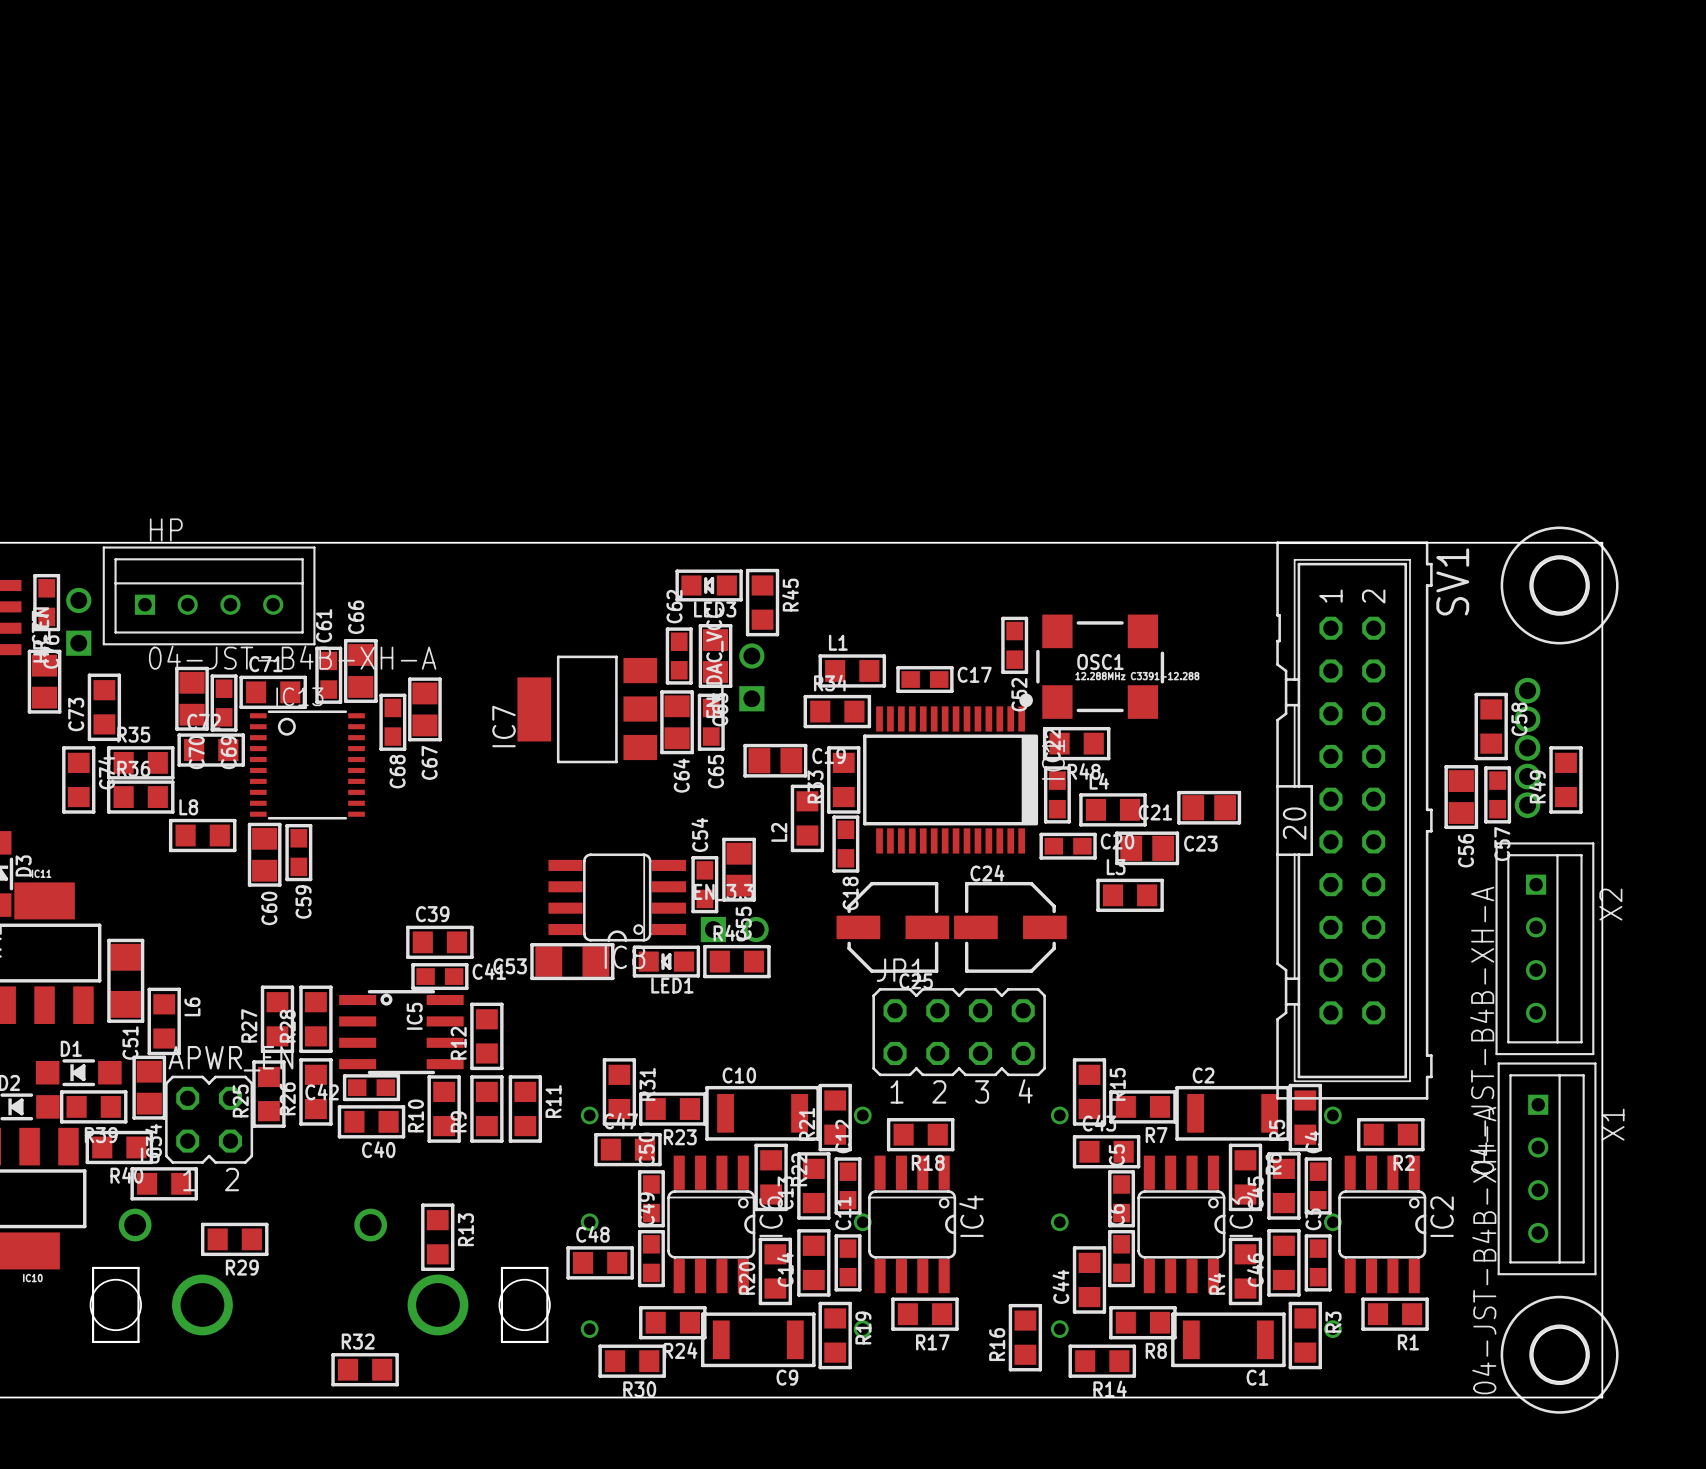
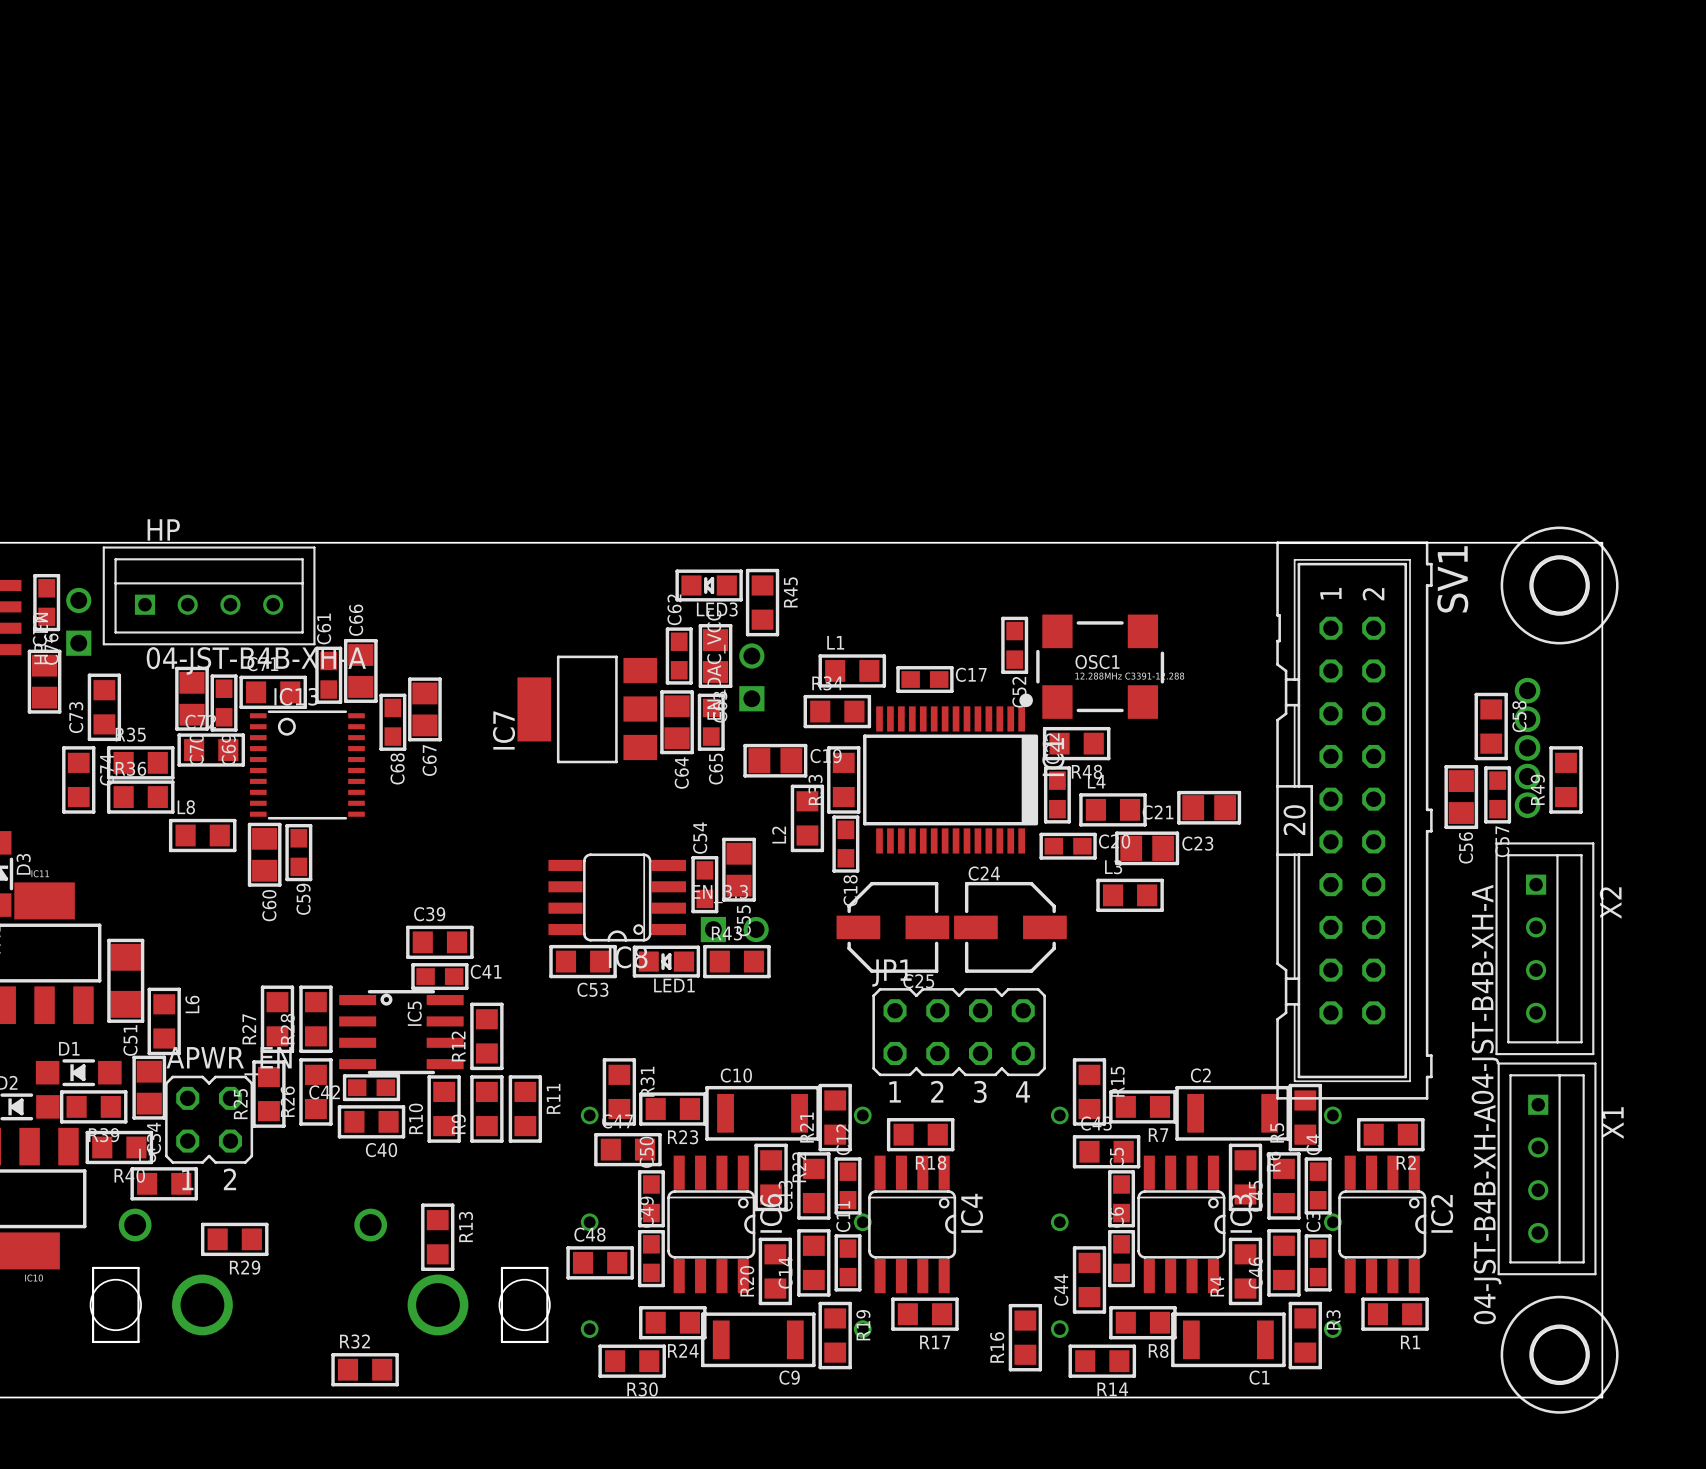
C53 footprint: [530, 943, 615, 981] -> [549, 944, 617, 979]
C53 name position: C53 (510, 966) -> C53 (592, 989)

